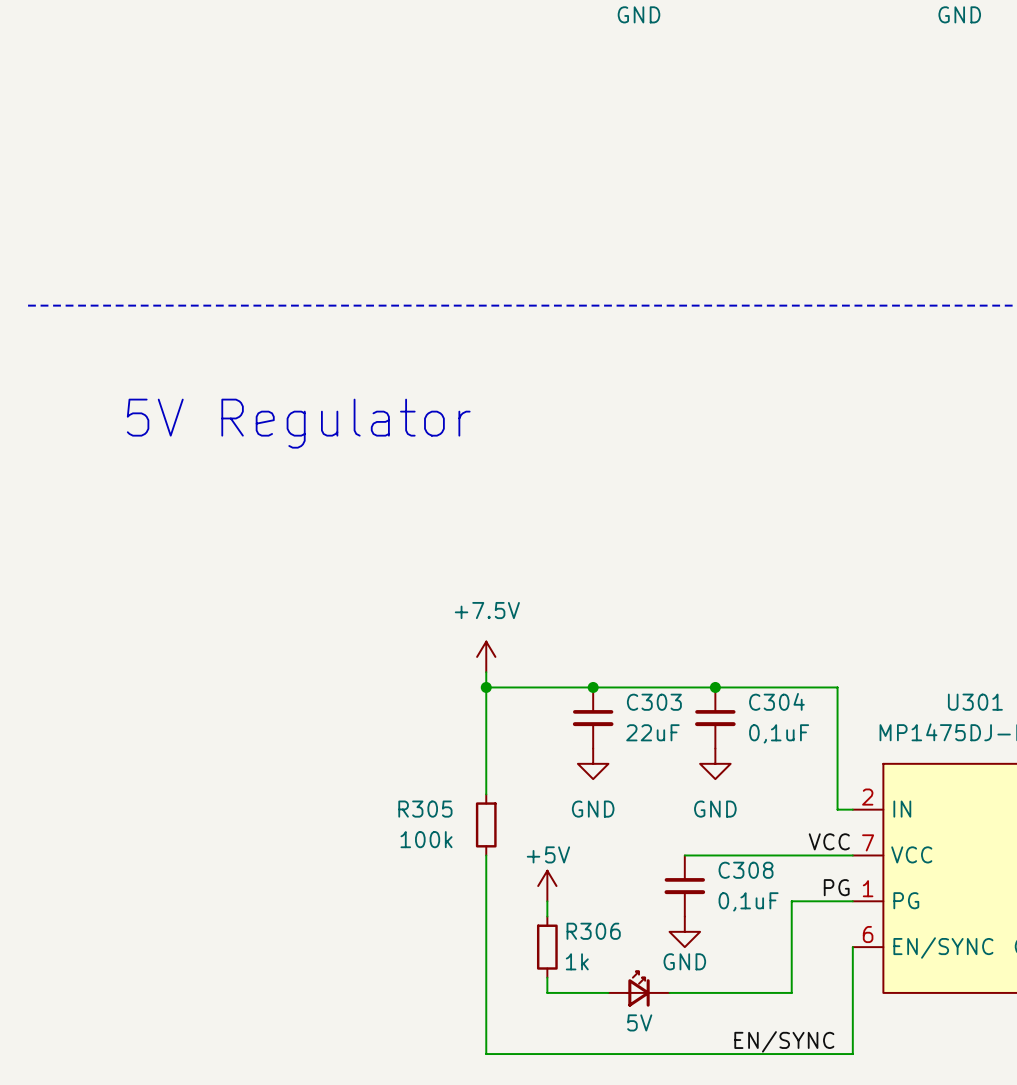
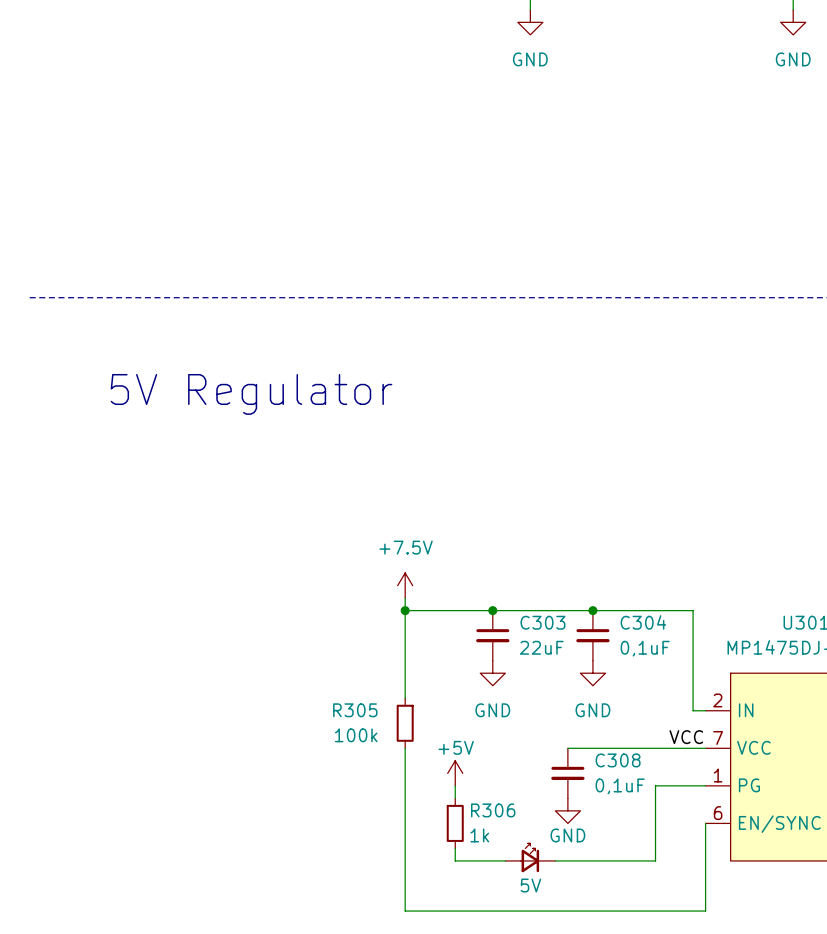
label: PG (836, 887) -> none
label: EN/SYNC (784, 1041) -> none

